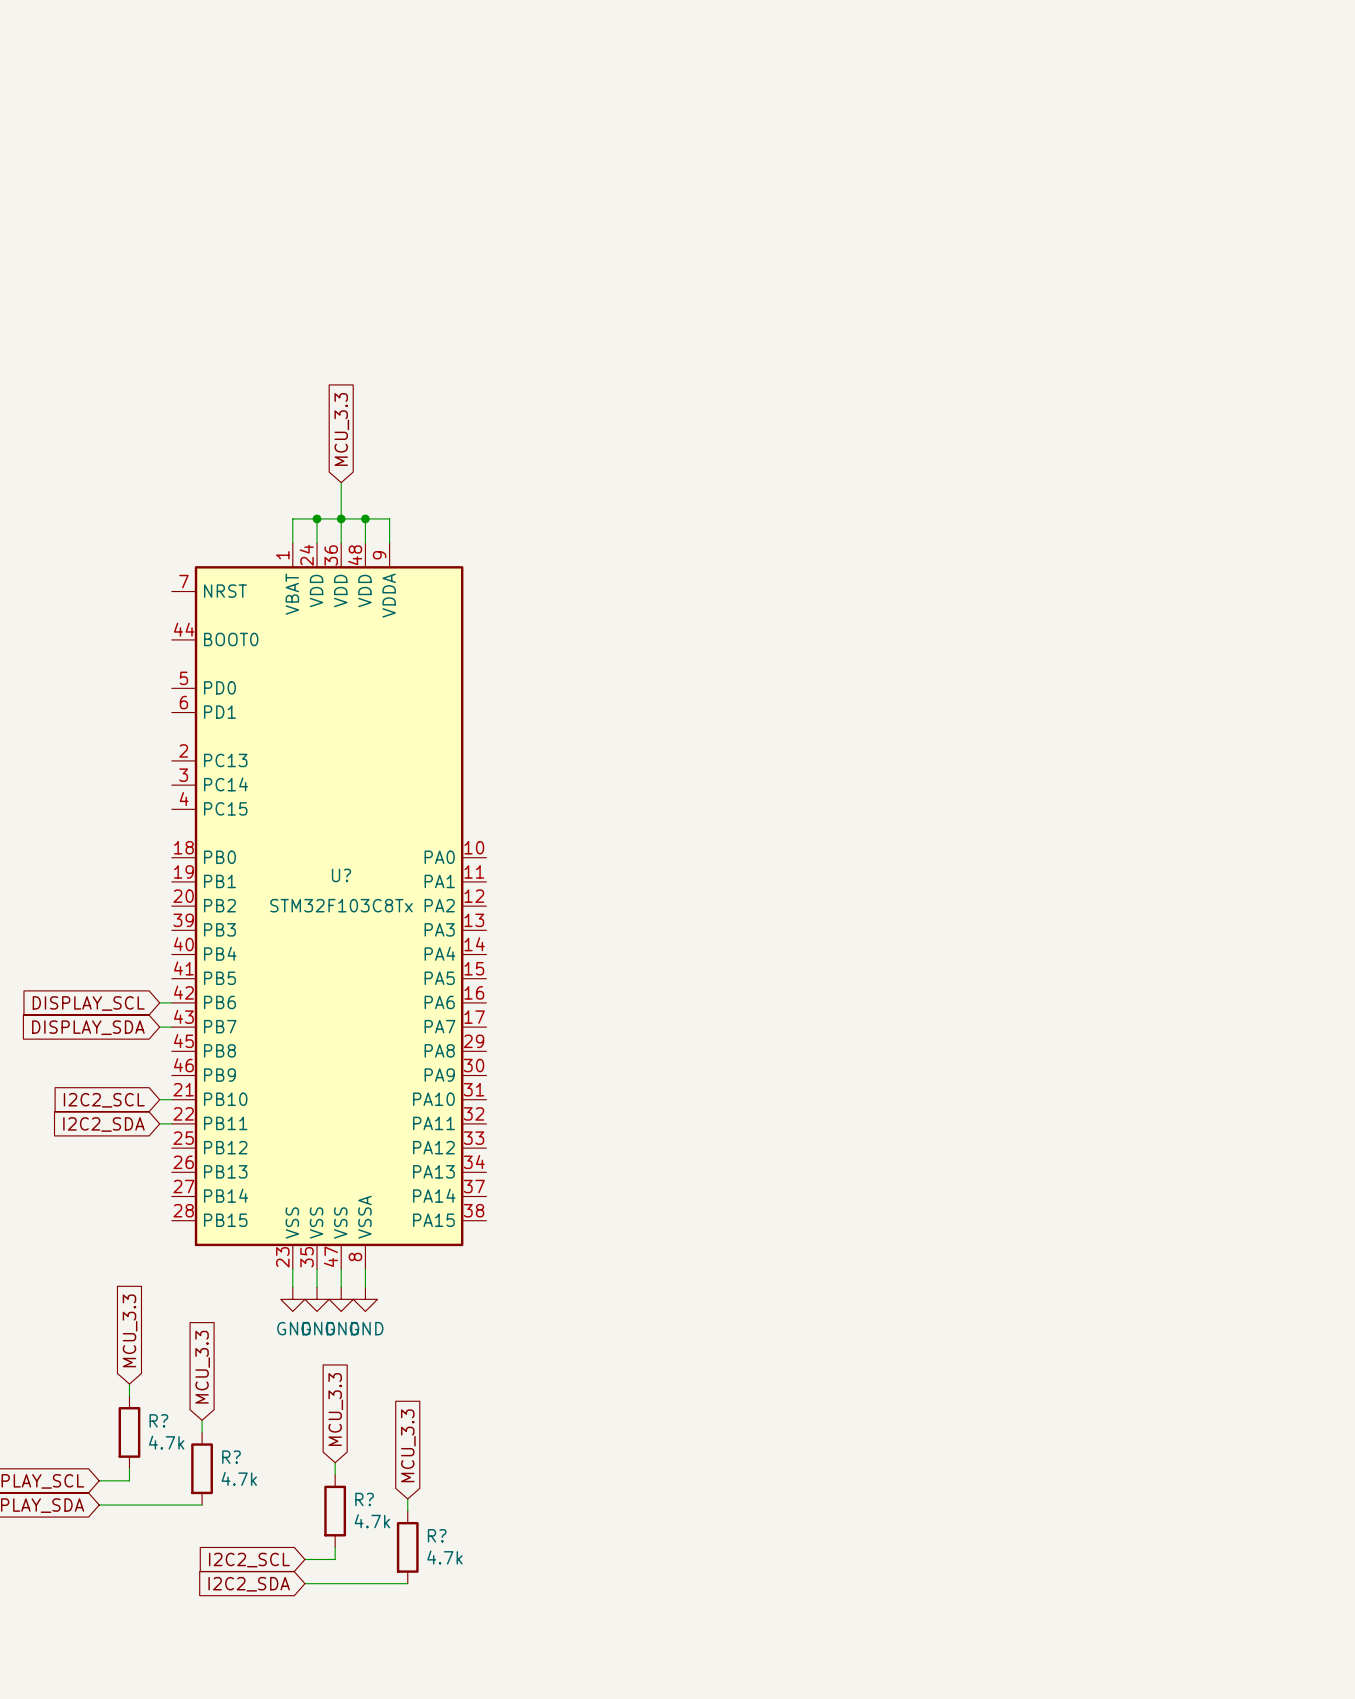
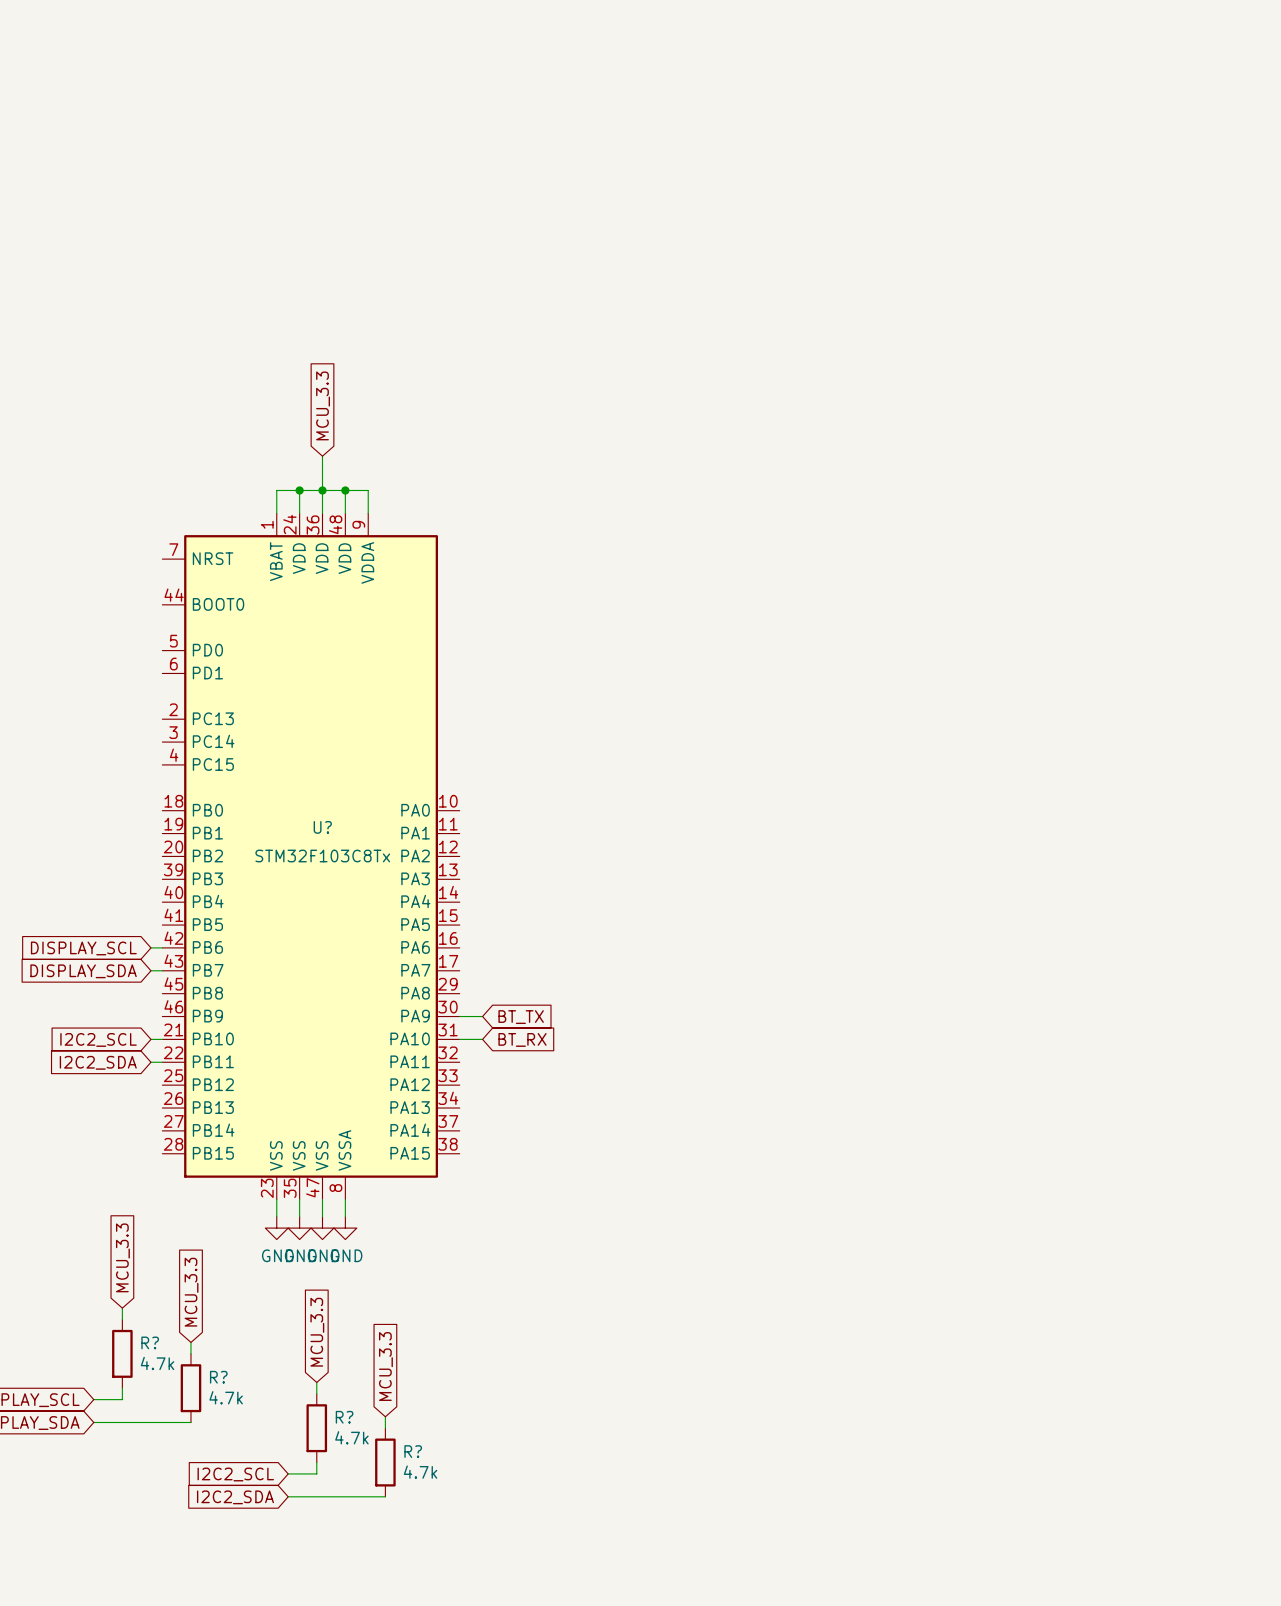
wire: none -> (459, 1016) (482, 1016)
global label: none -> BT_TX (521, 1017)
wire: none -> (459, 1039) (482, 1039)
global label: none -> BT_RX (522, 1039)

